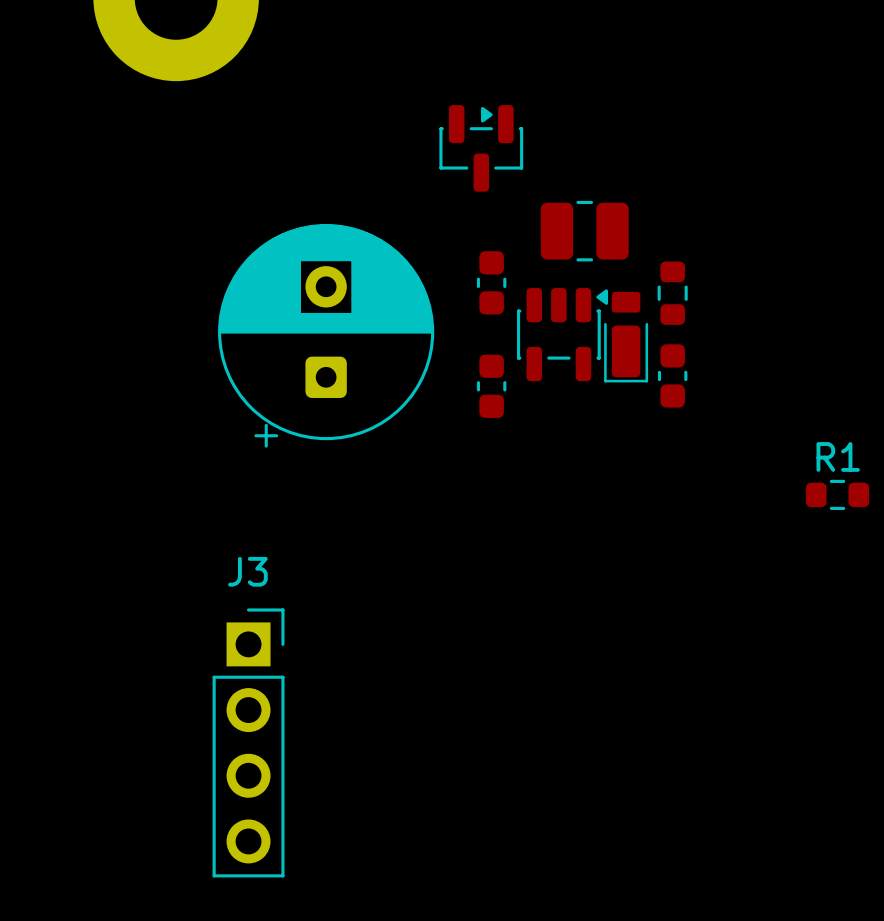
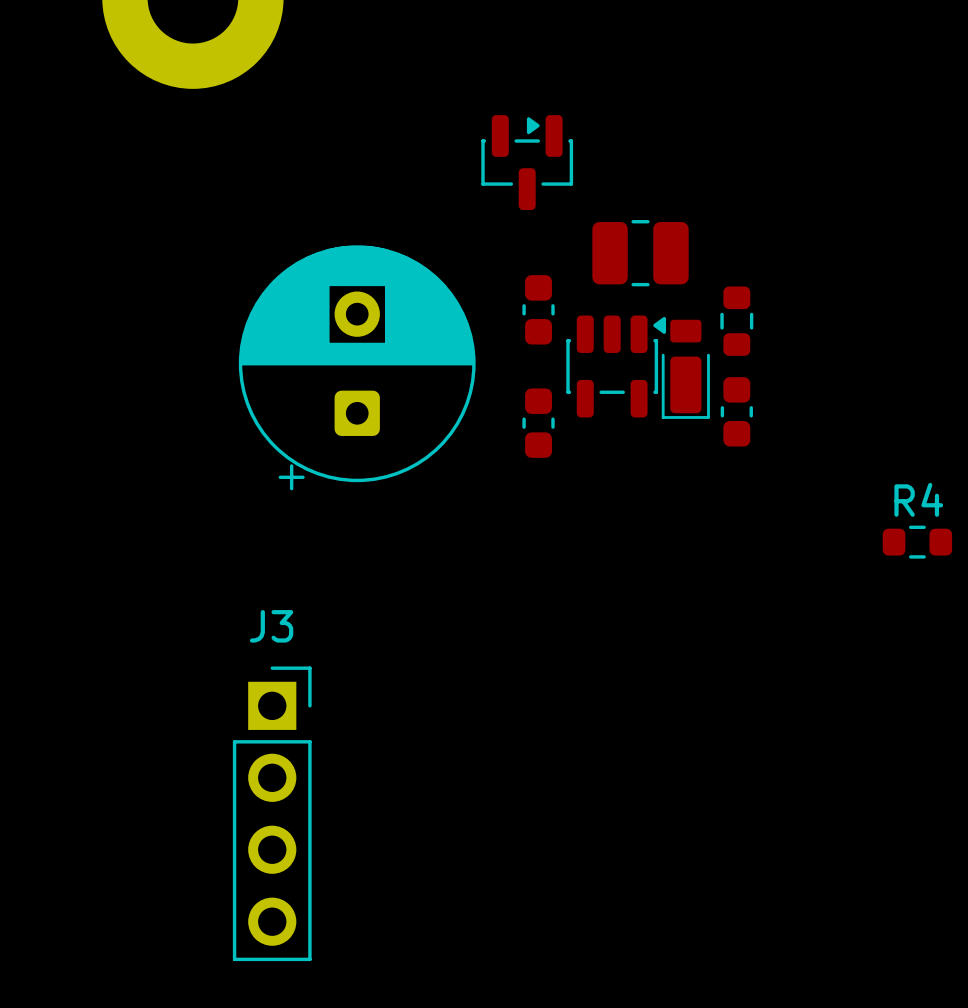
R1 name: R1 (838, 456) -> R4 (918, 499)

